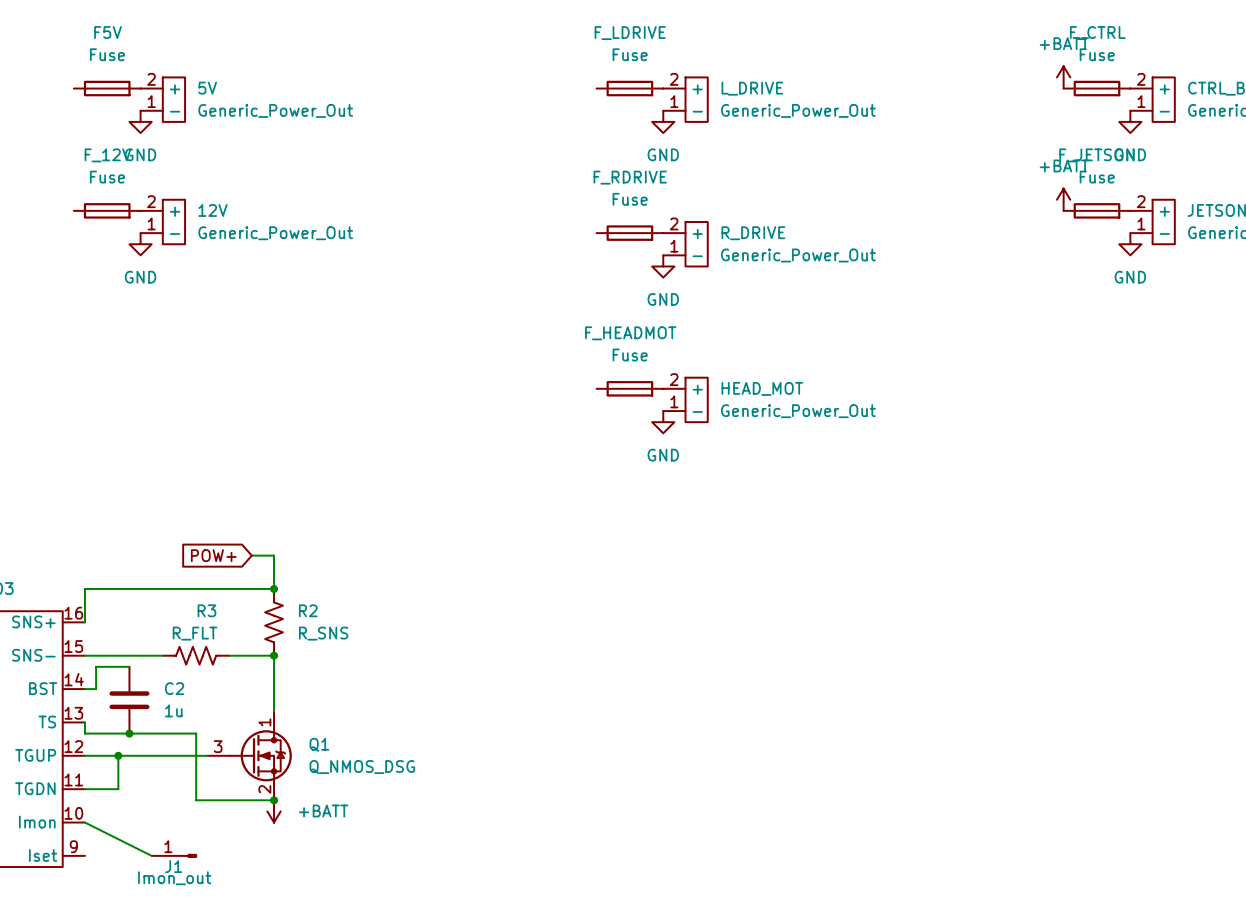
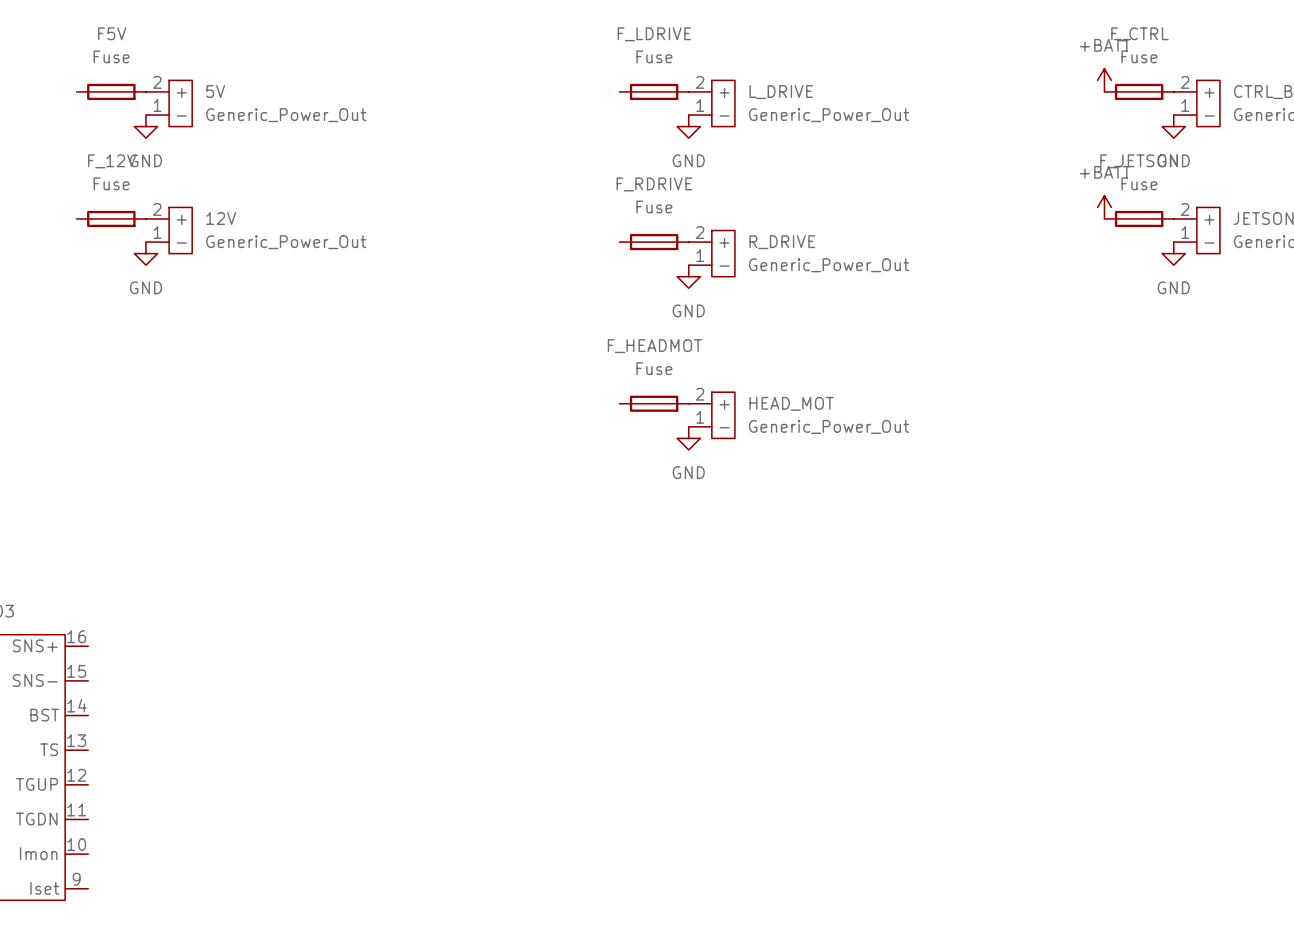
global label: POW+ (213, 555) -> none
wire: (251, 555) (274, 555) (274, 588) (84, 588) (84, 622) -> none
junction: (274, 588) -> none
R2: R_SNS (274, 622) -> none
wire: (84, 655) (162, 655) -> none
R3: R_FLT (196, 655) -> none
wire: (229, 655) (274, 655) (274, 711) -> none
junction: (274, 655) -> none
wire: (129, 666) (96, 666) (96, 689) (84, 689) -> none
C2: 1u (129, 700) -> none
wire: (84, 722) (84, 733) (196, 733) (196, 800) (274, 800) -> none
junction: (129, 733) -> none
wire: (84, 755) (207, 755) -> none
wire: (118, 755) (118, 789) (84, 789) -> none
junction: (118, 755) -> none
Q1: Q_NMOS_DSG (249, 755) -> none
junction: (274, 800) -> none
power symbol: +BATT (274, 811) -> none
wire: (84, 822) (151, 855) -> none
J1: Imon_out (174, 855) -> none

